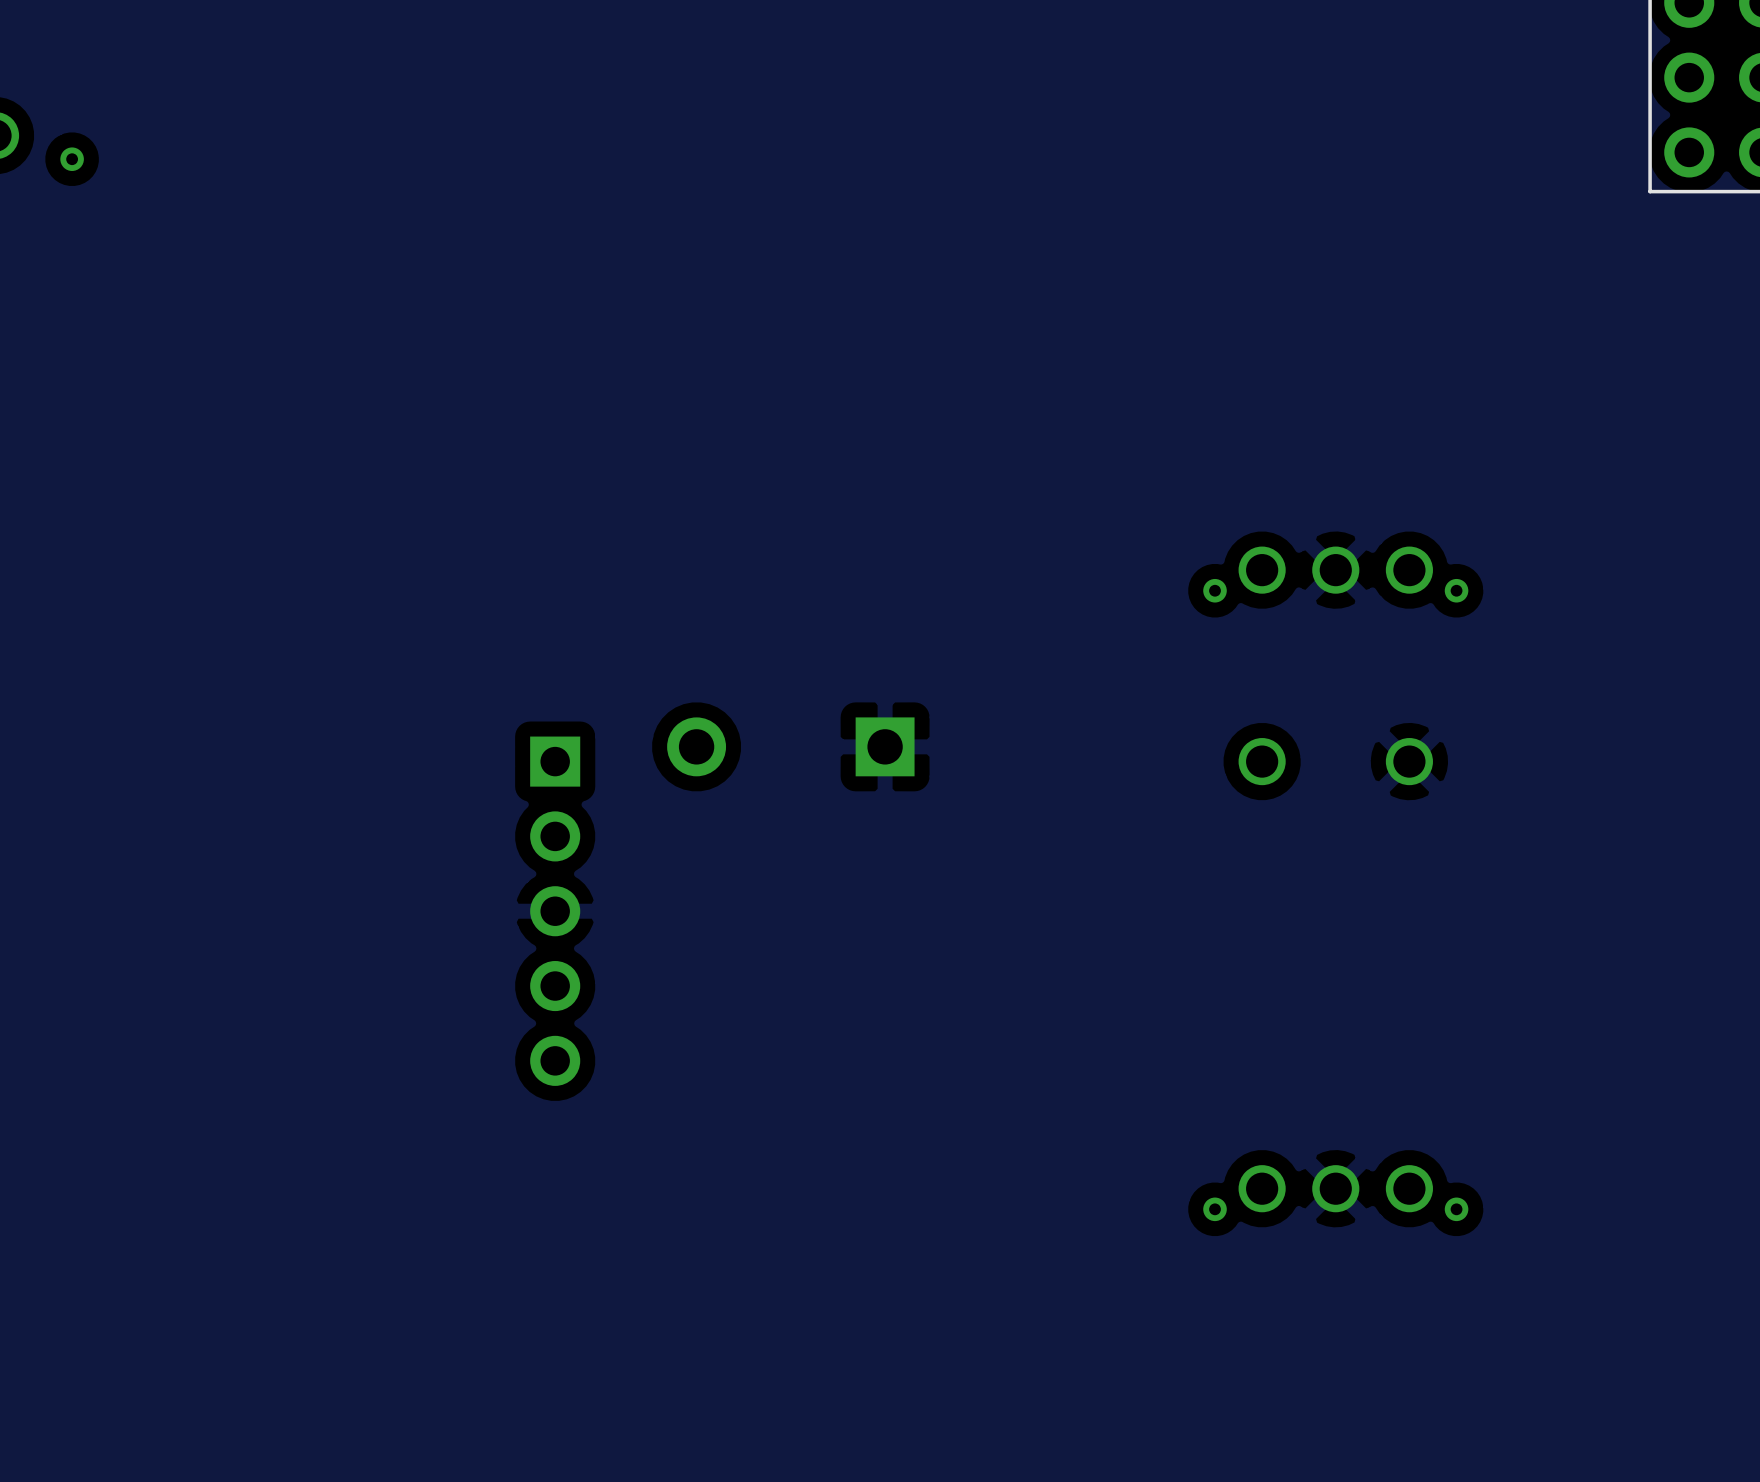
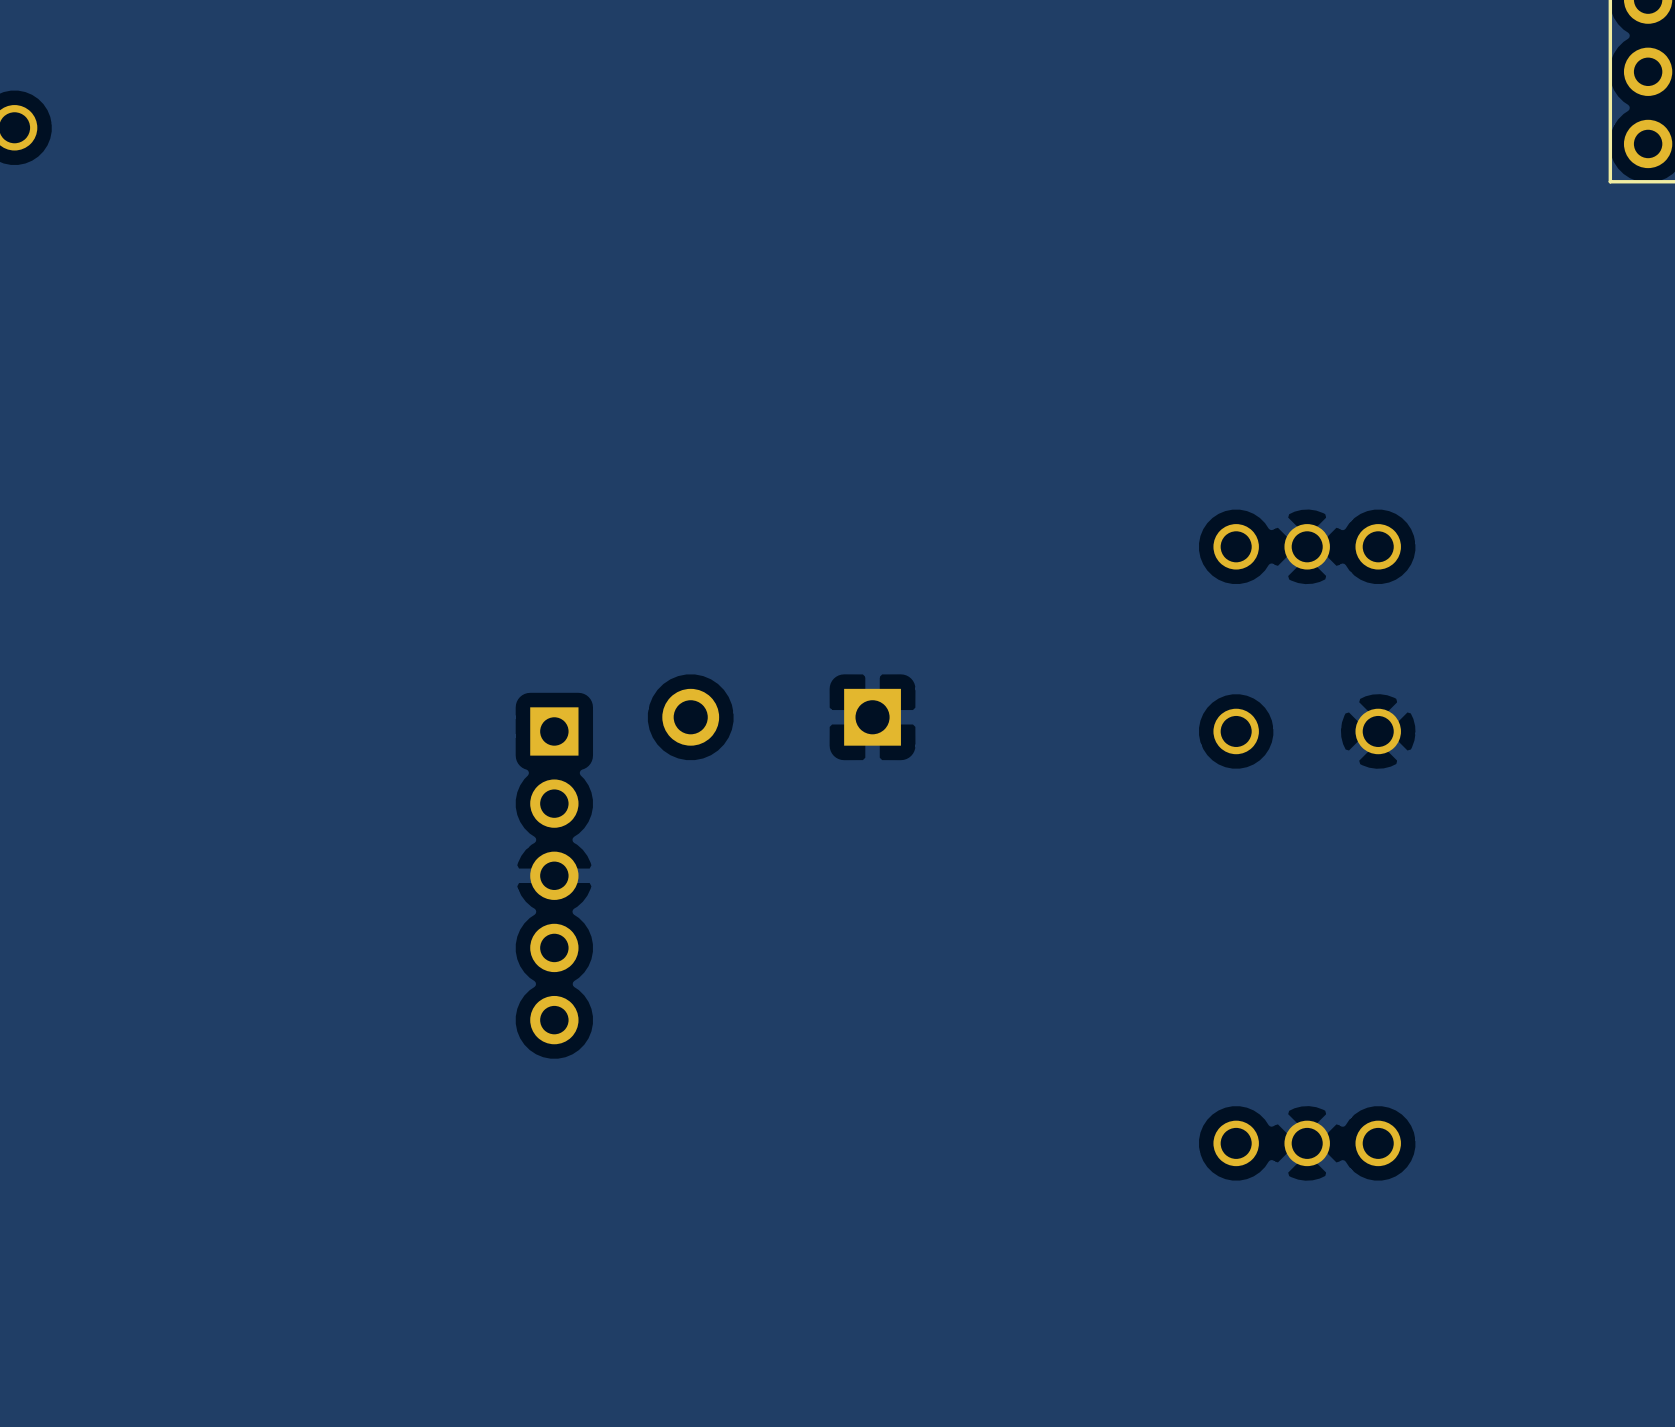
via: (72, 159) -> none
via: (1215, 590) -> none
via: (1456, 590) -> none
via: (1215, 1209) -> none
via: (1456, 1209) -> none

